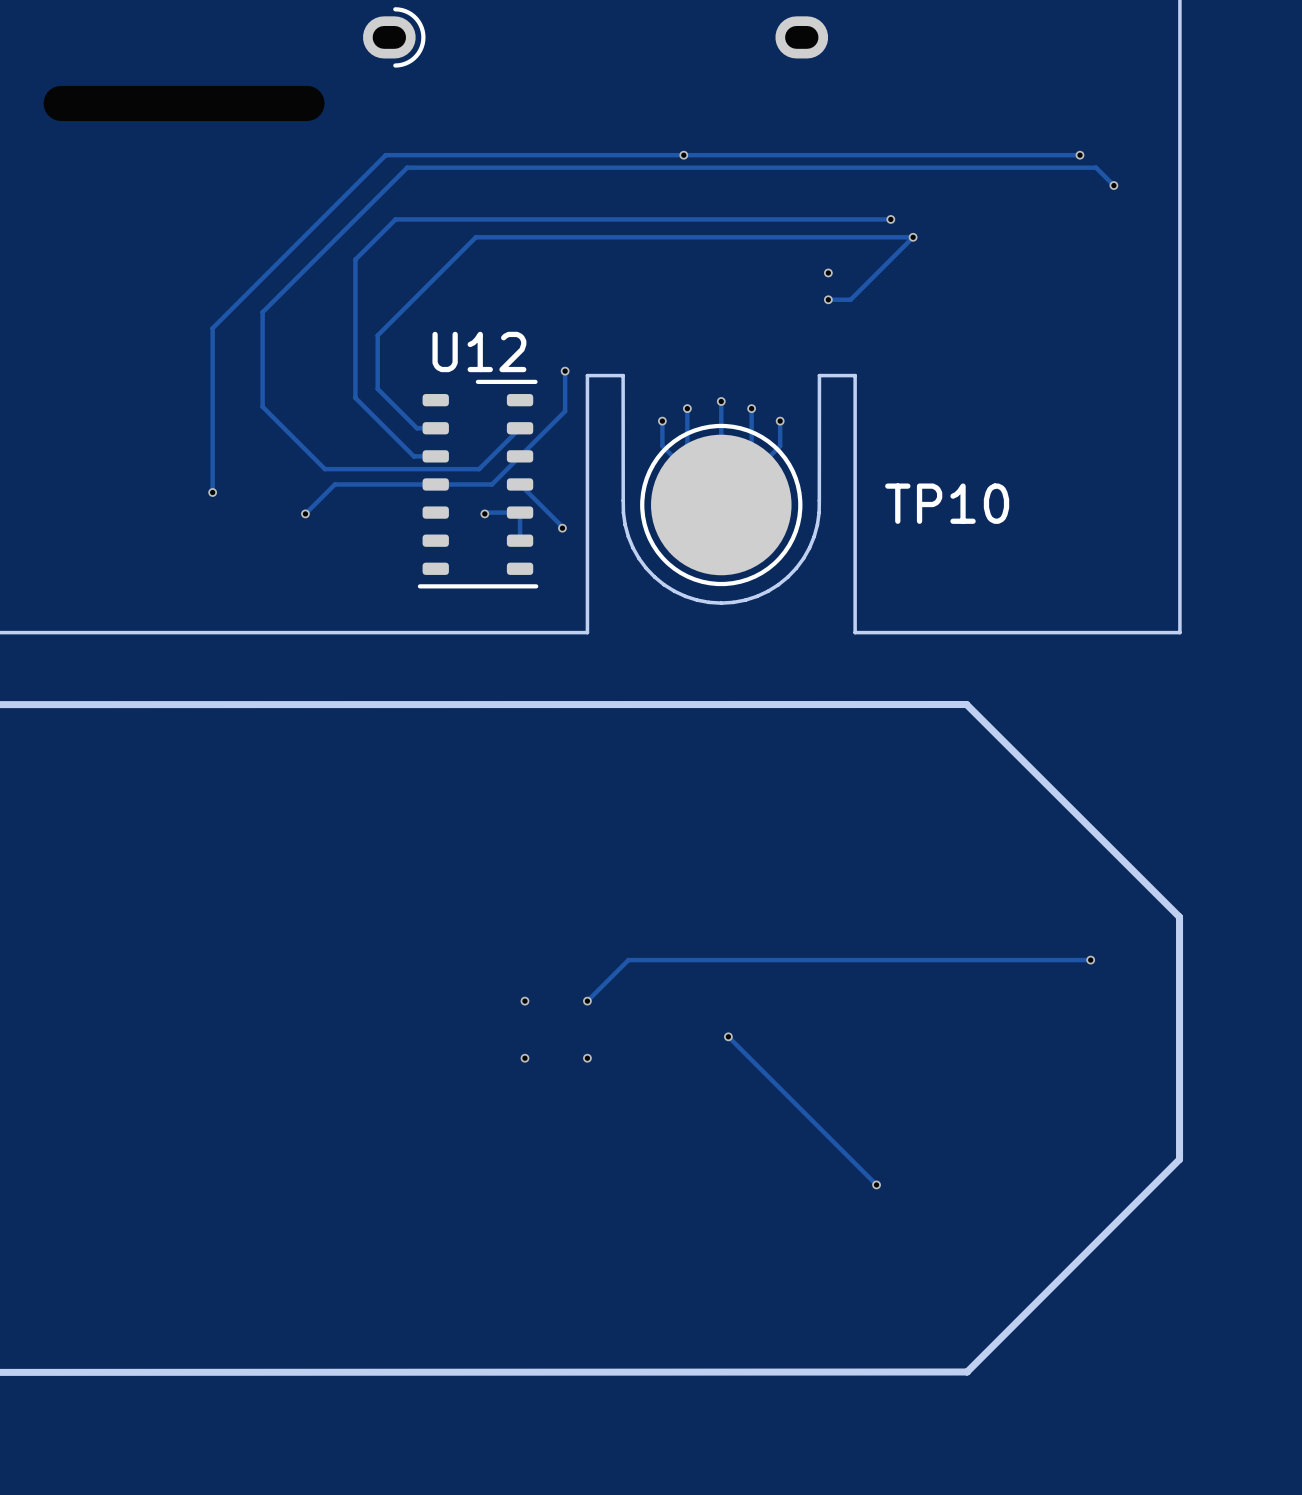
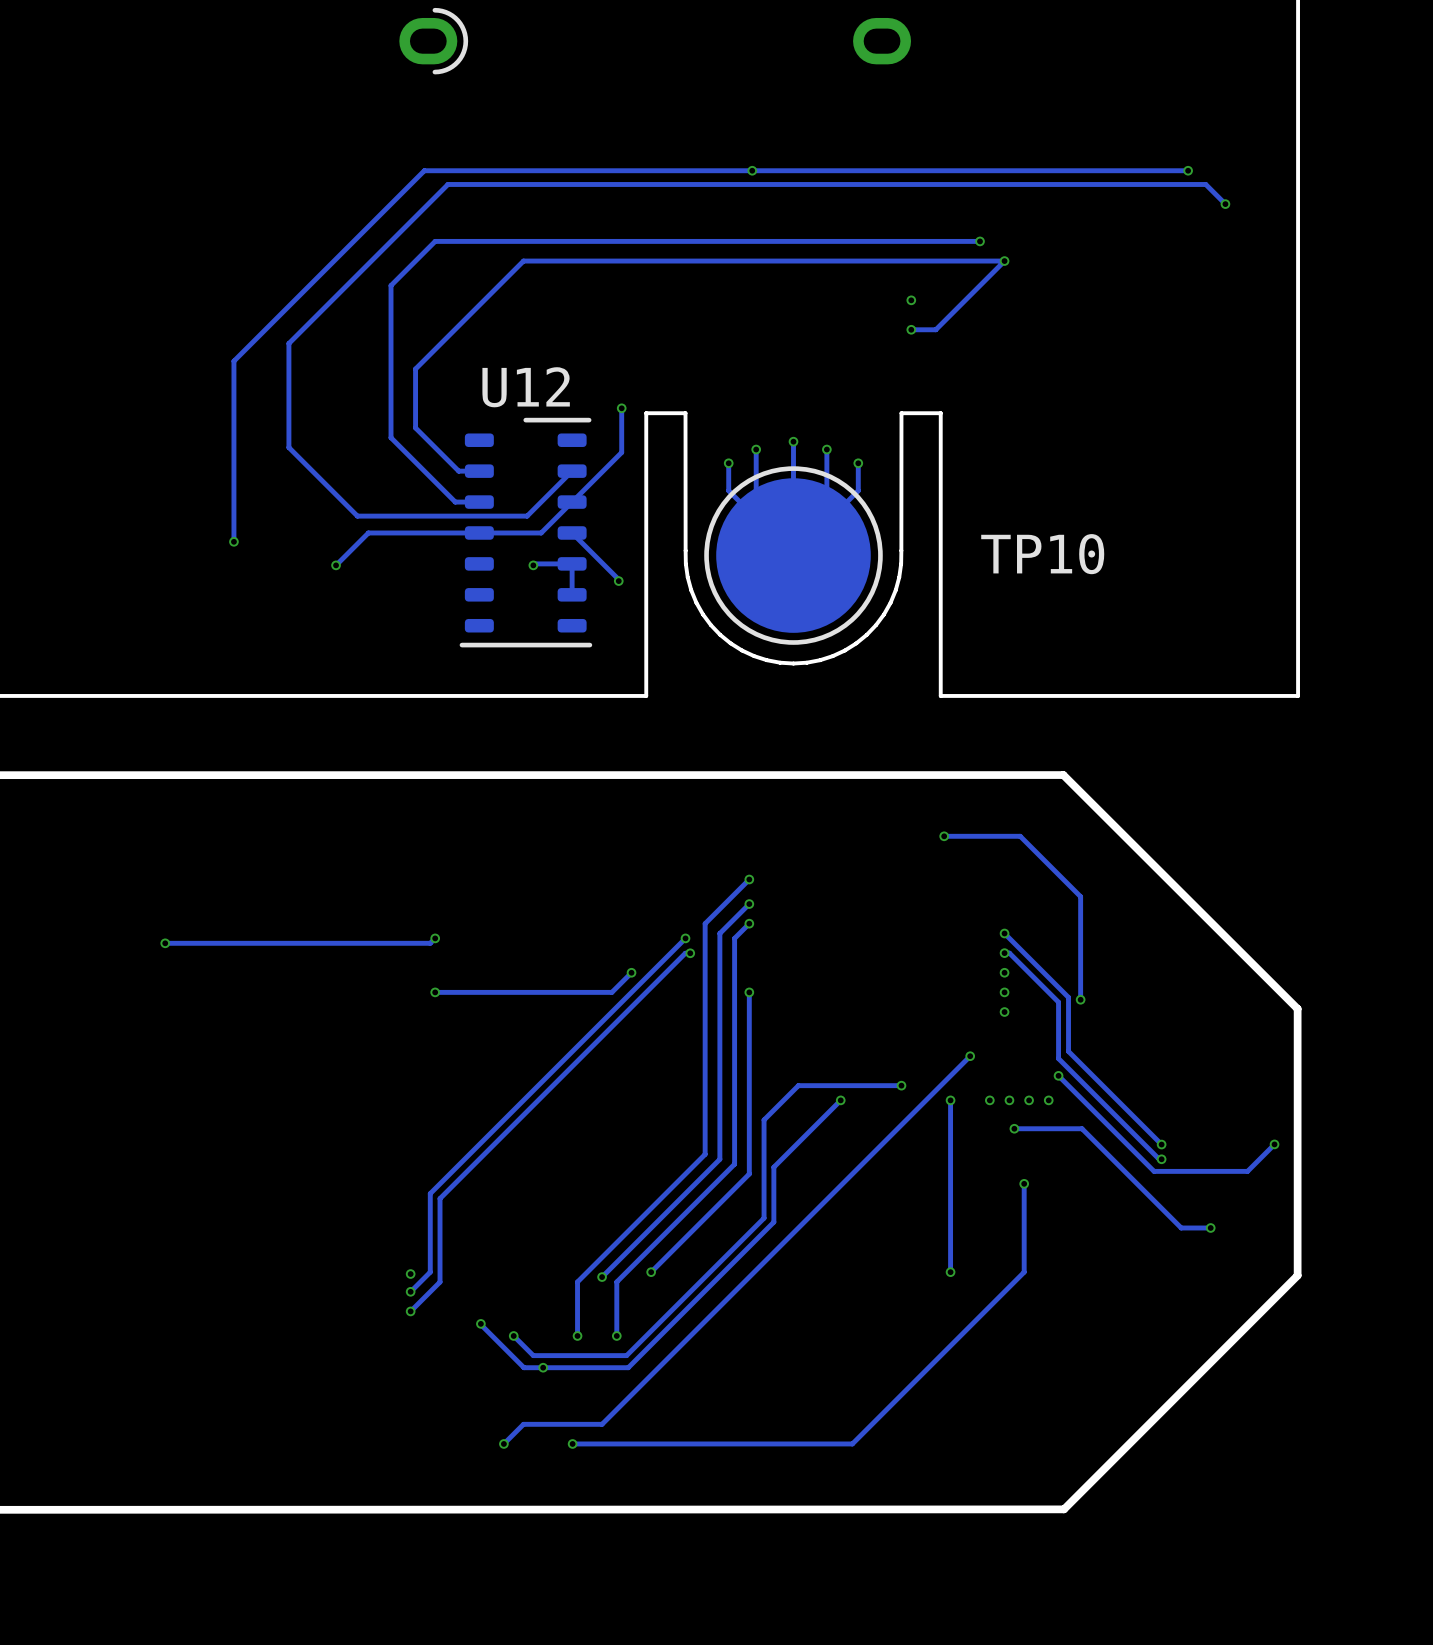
track: none -> (944, 836) (1020, 836) (1080, 896) (1080, 999)
via: none -> (944, 836)
track: none -> (749, 879) (705, 923) (705, 1154) (577, 1281) (577, 1335)
via: none -> (749, 879)
track: none -> (749, 904) (719, 933) (719, 1159) (602, 1277)
via: none -> (749, 904)
track: none -> (749, 923) (734, 938) (734, 1164) (616, 1281) (616, 1335)
via: none -> (749, 923)
track: none -> (1004, 933) (1068, 997) (1068, 1051) (1161, 1144)
via: none -> (1004, 933)
track: none -> (435, 938) (430, 943) (165, 943)
via: none -> (435, 938)
track: none -> (685, 938) (430, 1193) (430, 1272) (410, 1291)
via: none -> (685, 938)
via: none -> (165, 943)
track: none -> (690, 953) (685, 953) (440, 1198) (440, 1282) (410, 1311)
via: none -> (690, 953)
track: none -> (1004, 953) (1009, 953) (1058, 1002) (1058, 1058) (1159, 1159) (1161, 1159)
via: none -> (1004, 953)
track: none -> (631, 972) (611, 992) (435, 992)
via: none -> (631, 972)
via: none -> (1004, 972)
via: none -> (435, 992)
track: none -> (749, 992) (749, 1174) (651, 1272)
via: none -> (749, 992)
via: none -> (1004, 992)
via: none -> (1080, 999)
via: none -> (1004, 1012)
track: none -> (970, 1056) (602, 1424) (523, 1424) (503, 1443)
via: none -> (970, 1056)
track: (1090, 960) (628, 960) (587, 1001) -> none
via: (1090, 960) -> none
track: none -> (1058, 1075) (1154, 1171) (1247, 1171) (1274, 1144)
via: none -> (1058, 1075)
track: none -> (901, 1085) (798, 1085) (764, 1120) (764, 1218) (626, 1355) (533, 1355) (513, 1335)
via: none -> (901, 1085)
track: none -> (840, 1100) (773, 1167) (773, 1222) (628, 1367) (523, 1367) (480, 1324)
track: none -> (950, 1100) (950, 1272)
via: none -> (950, 1100)
via: none -> (989, 1100)
via: none -> (1009, 1100)
via: none -> (1029, 1100)
via: none -> (1048, 1100)
via: (524, 1001) -> none
via: (587, 1001) -> none
track: none -> (1014, 1128) (1082, 1128) (1181, 1227) (1210, 1227)
via: none -> (1014, 1128)
track: (728, 1036) (876, 1184) -> none
via position: (728, 1036) -> (840, 1100)
via: none -> (1161, 1144)
via: none -> (1274, 1144)
via: none -> (1161, 1159)
via: (524, 1058) -> none
via: (587, 1058) -> none
track: none -> (1024, 1183) (1024, 1272) (852, 1443) (572, 1443)
via: none -> (1024, 1183)
via: none -> (1210, 1227)
via: none -> (651, 1272)
via: none -> (410, 1274)
via: none -> (602, 1277)
via: none -> (410, 1291)
via position: (876, 1184) -> (950, 1272)
via: none -> (410, 1311)
via: none -> (480, 1323)
via: none -> (513, 1335)
via: none -> (577, 1335)
via: none -> (616, 1335)
via: none -> (543, 1367)
via: none -> (503, 1443)
via: none -> (572, 1443)

